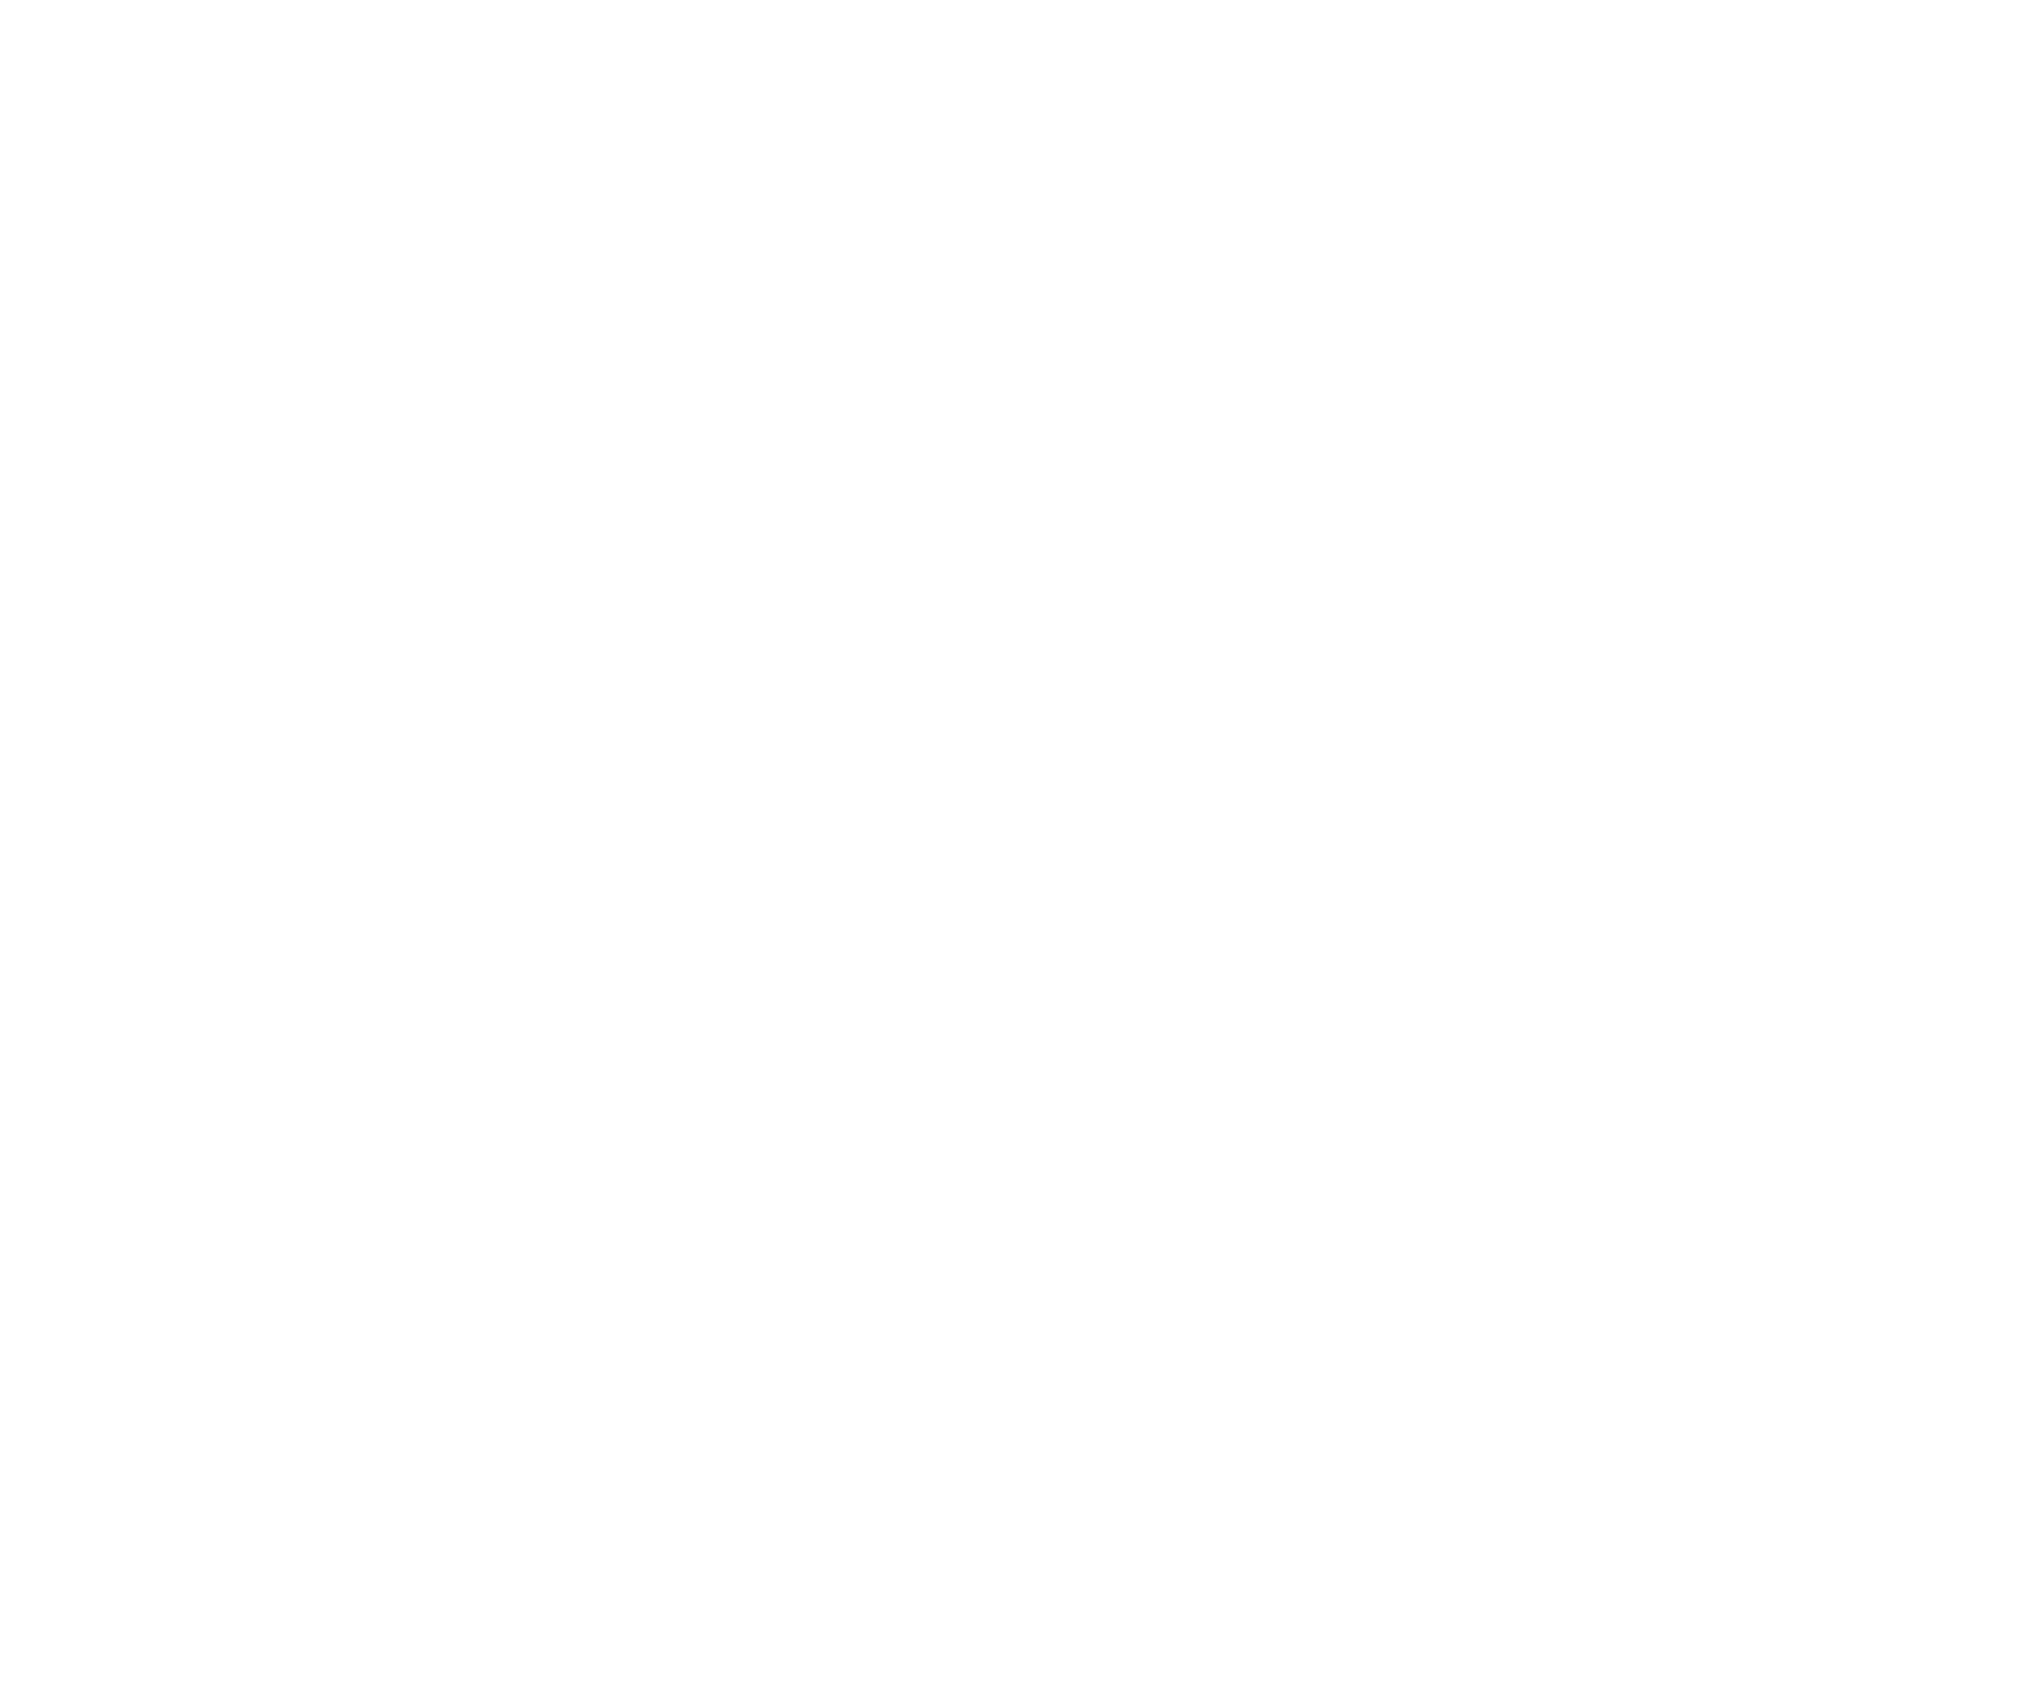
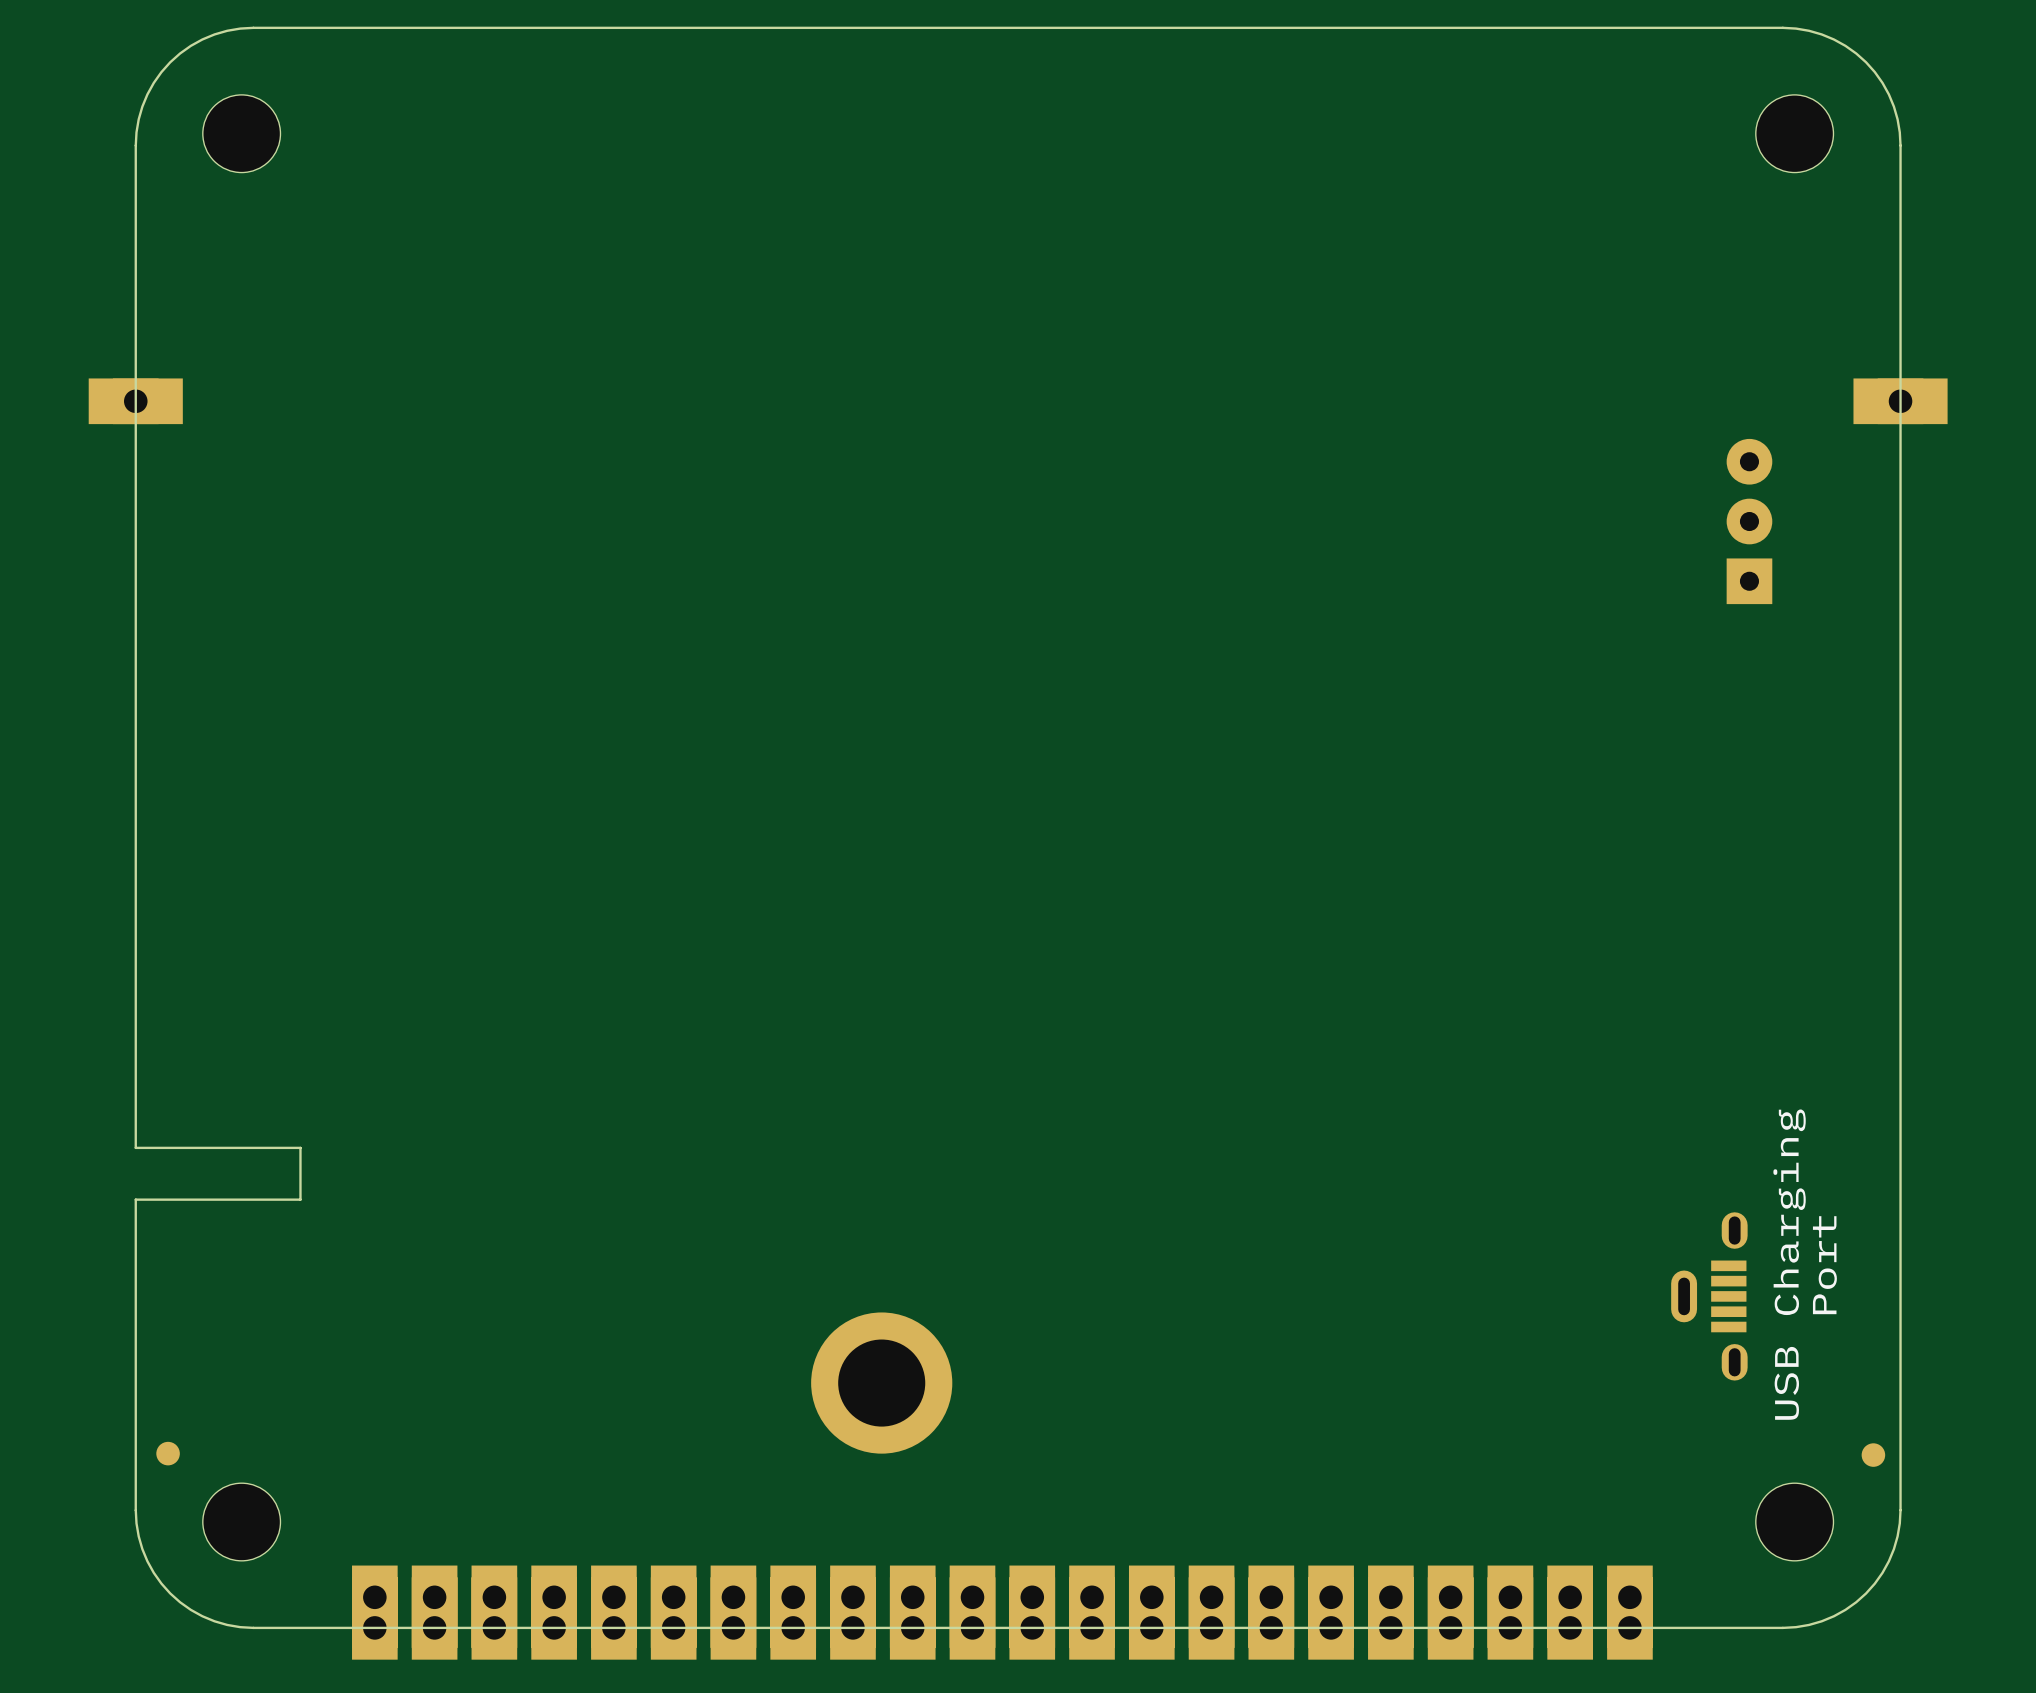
board edge: none -> (1782, 27) (253, 27) (214, 34) (190, 45) (170, 62) (153, 82) (142, 106) (135, 145) (135, 1147) (300, 1147) (300, 1199) (135, 1199) (136, 1523) (147, 1561) (170, 1593) (190, 1609) (214, 1621) (253, 1627) (1782, 1627) (1809, 1624) (1833, 1616) (1866, 1593) (1888, 1561) (1897, 1536) (1900, 1510) (1900, 145) (1893, 106) (1882, 82) (1866, 62) (1845, 45) (1821, 34) (1782, 27)
part: none -> (241, 133)
part: none -> (1794, 133)
part: none -> (135, 401)
part: none -> (1900, 401)
part: none -> (1749, 521)
text: none -> Port (1824, 1265)
text: none -> USB Charging (1789, 1264)
part: none -> (1709, 1296)
part: none -> (881, 1383)
part: none -> (168, 1453)
part: none -> (1873, 1455)
part: none -> (241, 1522)
part: none -> (1794, 1522)
part: none -> (1002, 1612)

